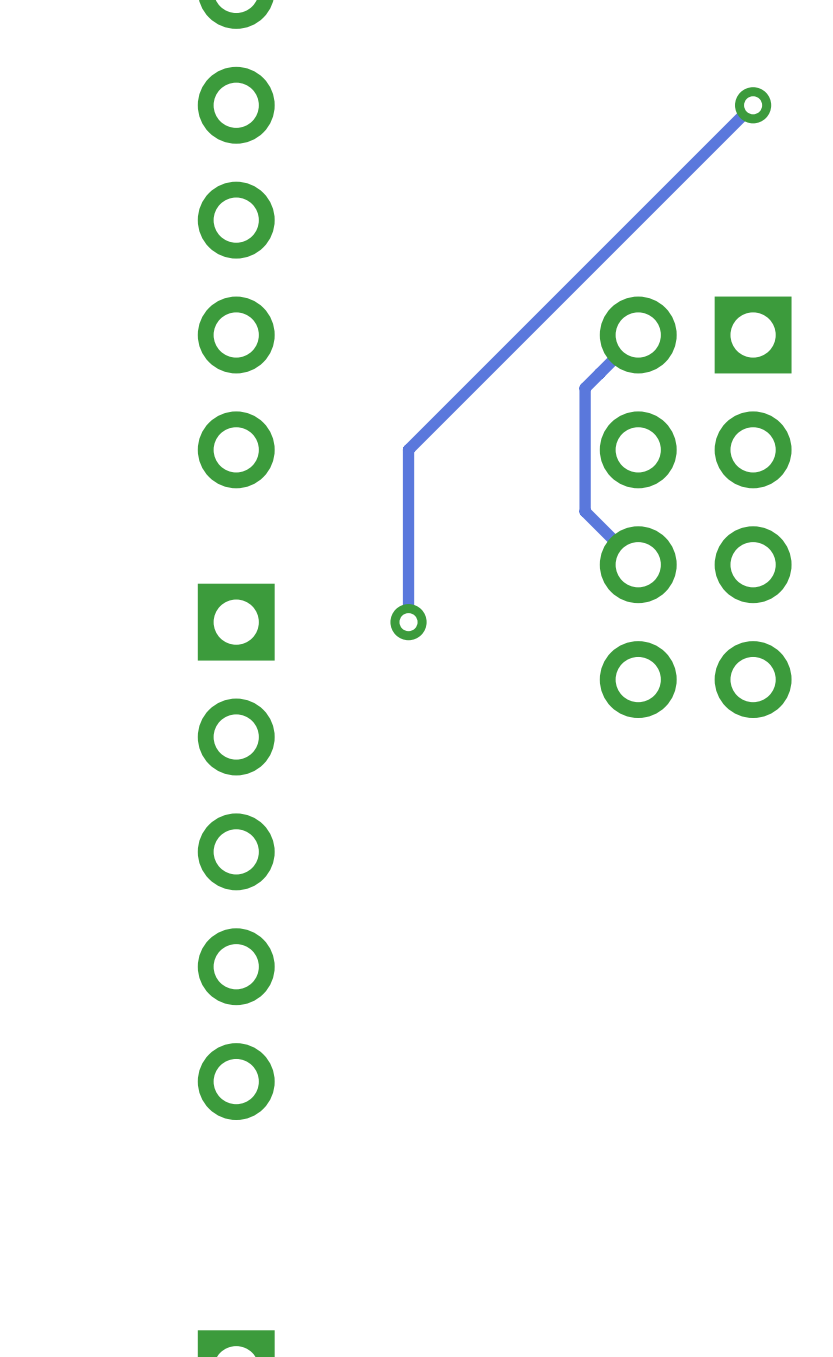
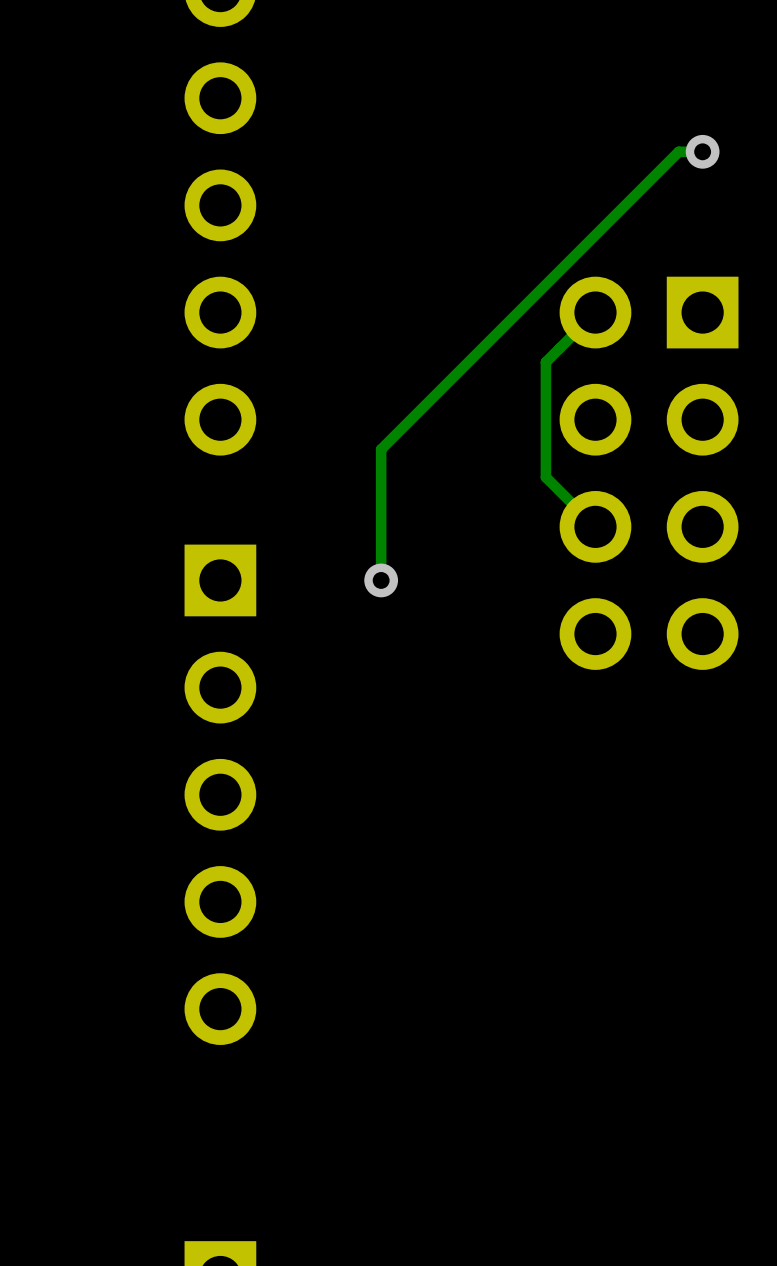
track: (753, 105) (408, 449) (408, 481) -> (702, 151) (678, 151) (381, 449)
via position: (753, 105) -> (702, 151)

